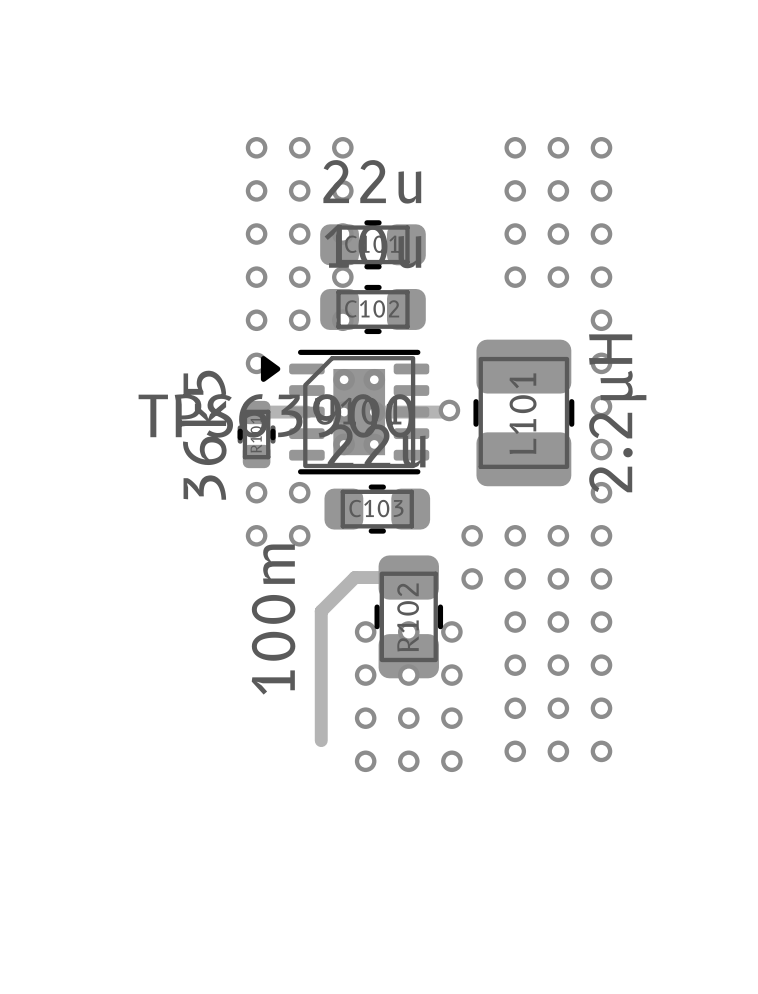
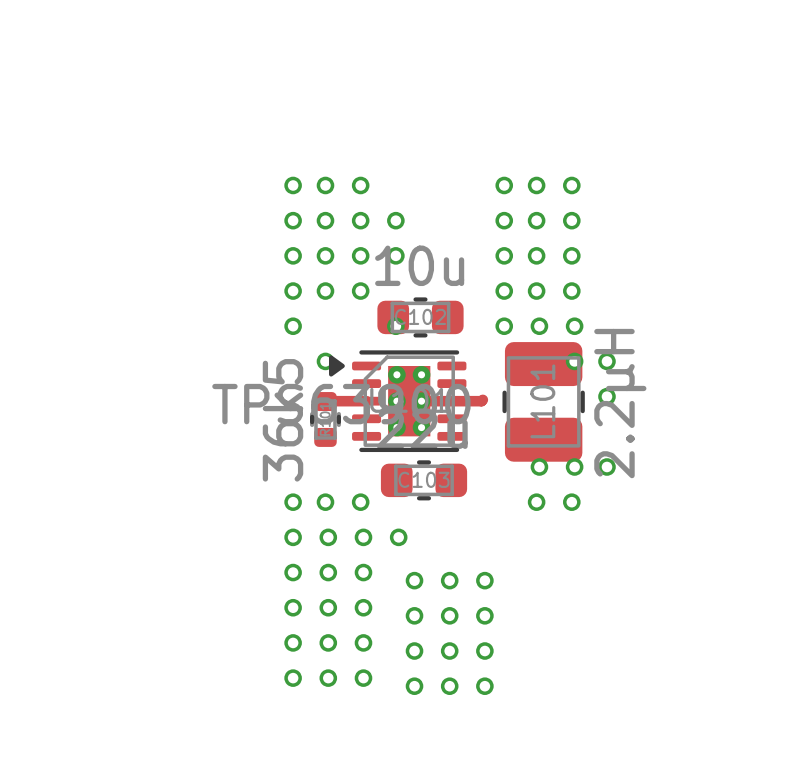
via: none -> (293, 185)
via: (342, 147) -> none
via: none -> (504, 185)
via: (601, 147) -> none
via: none -> (293, 220)
via: none -> (504, 220)
via: (601, 190) -> none
via: none -> (293, 255)
via: none -> (504, 255)
via: (601, 234) -> none
part: 22u (372, 244) -> none
via: none -> (293, 291)
via: (342, 277) -> none
via: none -> (504, 291)
via: (601, 277) -> none
via: none -> (293, 326)
via: (256, 320) -> none
via: (299, 320) -> none
via: none -> (504, 326)
via: none -> (539, 326)
via: none -> (574, 326)
via: (601, 320) -> none
via: none -> (574, 361)
via: (449, 410) -> none
via: (601, 449) -> none
via: (256, 492) -> none
via: (299, 492) -> none
via: none -> (539, 466)
via: none -> (574, 466)
via: none -> (293, 502)
via: (472, 535) -> none
via: (601, 535) -> none
track: (408, 577) (354, 577) (321, 611) (321, 740) -> none
via: none -> (293, 537)
via: none -> (328, 537)
via: none -> (363, 537)
via: none -> (398, 537)
via: (472, 578) -> none
via: (515, 578) -> none
via: (558, 578) -> none
via: (601, 578) -> none
part: 100m (408, 616) -> none
via: none -> (293, 572)
via: none -> (328, 572)
via: none -> (363, 572)
via: (515, 622) -> none
via: (558, 622) -> none
via: (601, 622) -> none
via: none -> (293, 607)
via: none -> (328, 607)
via: none -> (363, 607)
via: (515, 665) -> none
via: (558, 665) -> none
via: (601, 665) -> none
via: none -> (293, 642)
via: none -> (328, 642)
via: none -> (363, 642)
via: (515, 708) -> none
via: (558, 708) -> none
via: (601, 708) -> none
via: none -> (293, 678)
via: none -> (328, 678)
via: none -> (363, 678)
via: (515, 751) -> none
via: (558, 751) -> none
via: (601, 751) -> none

